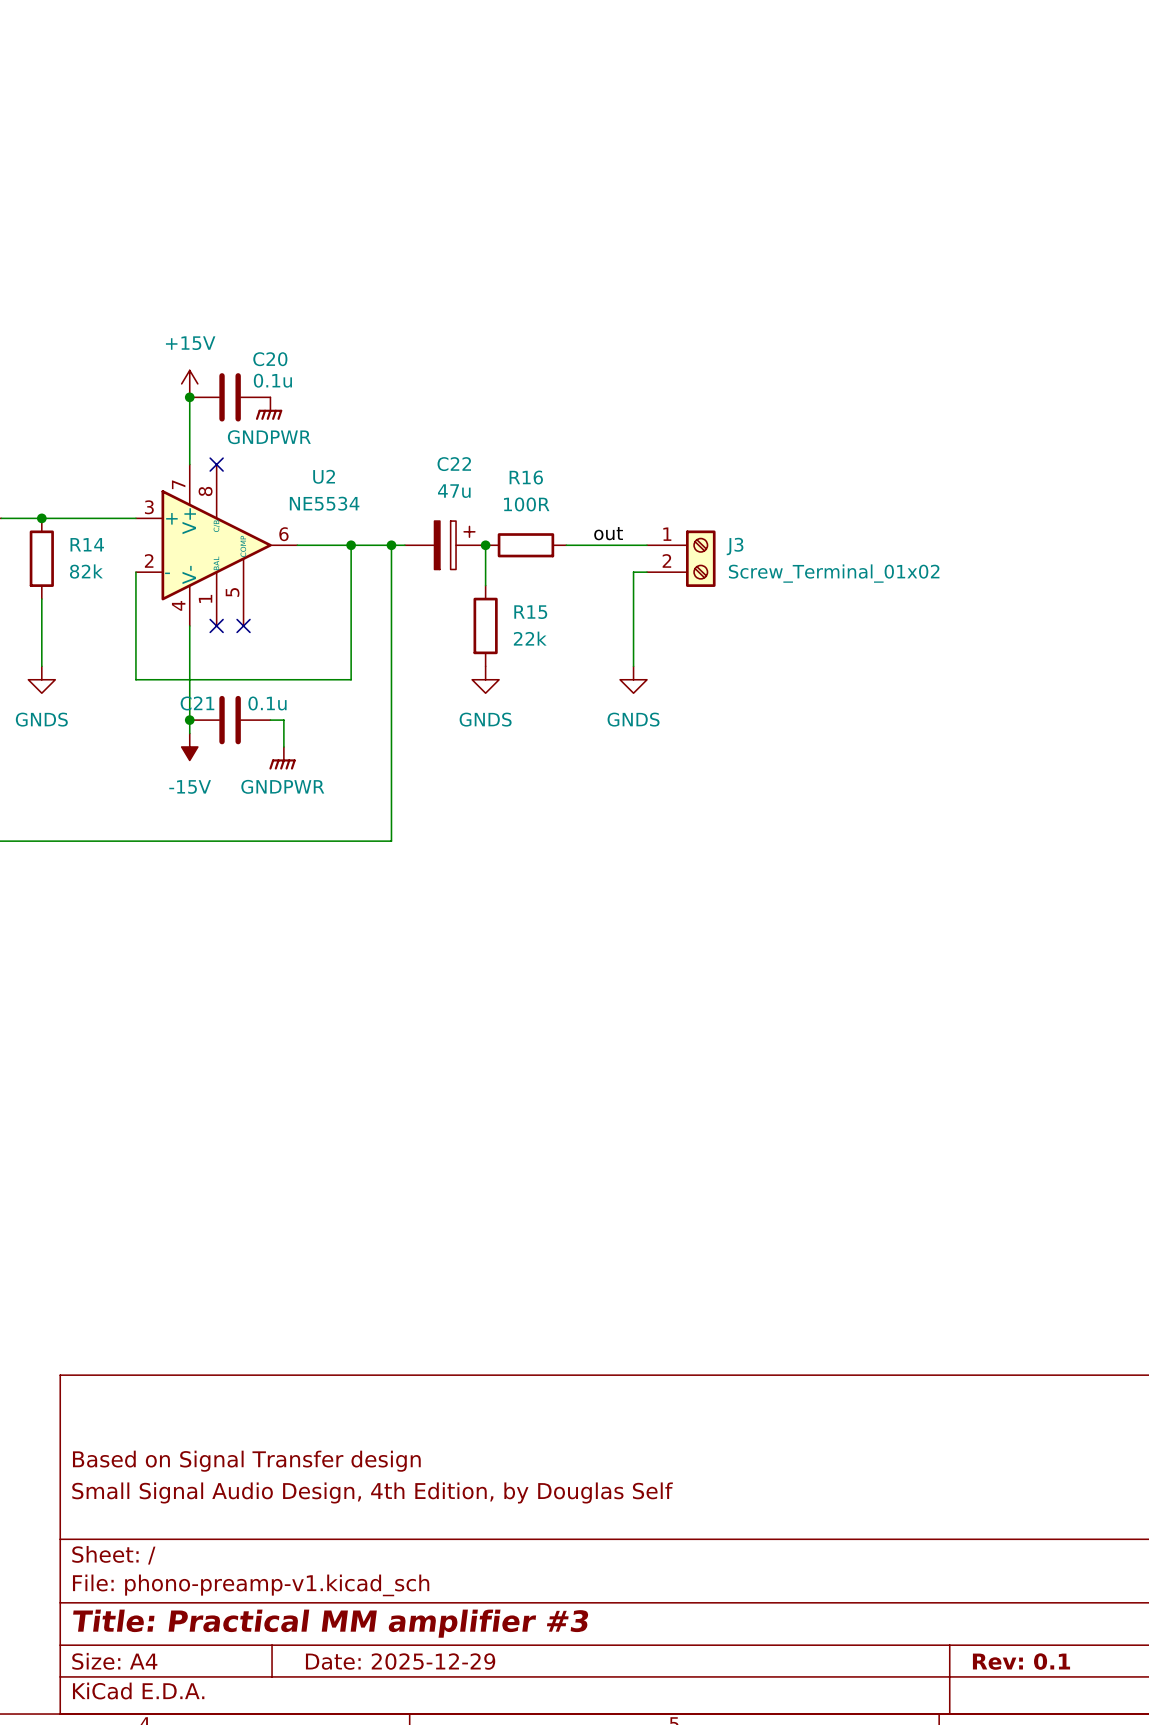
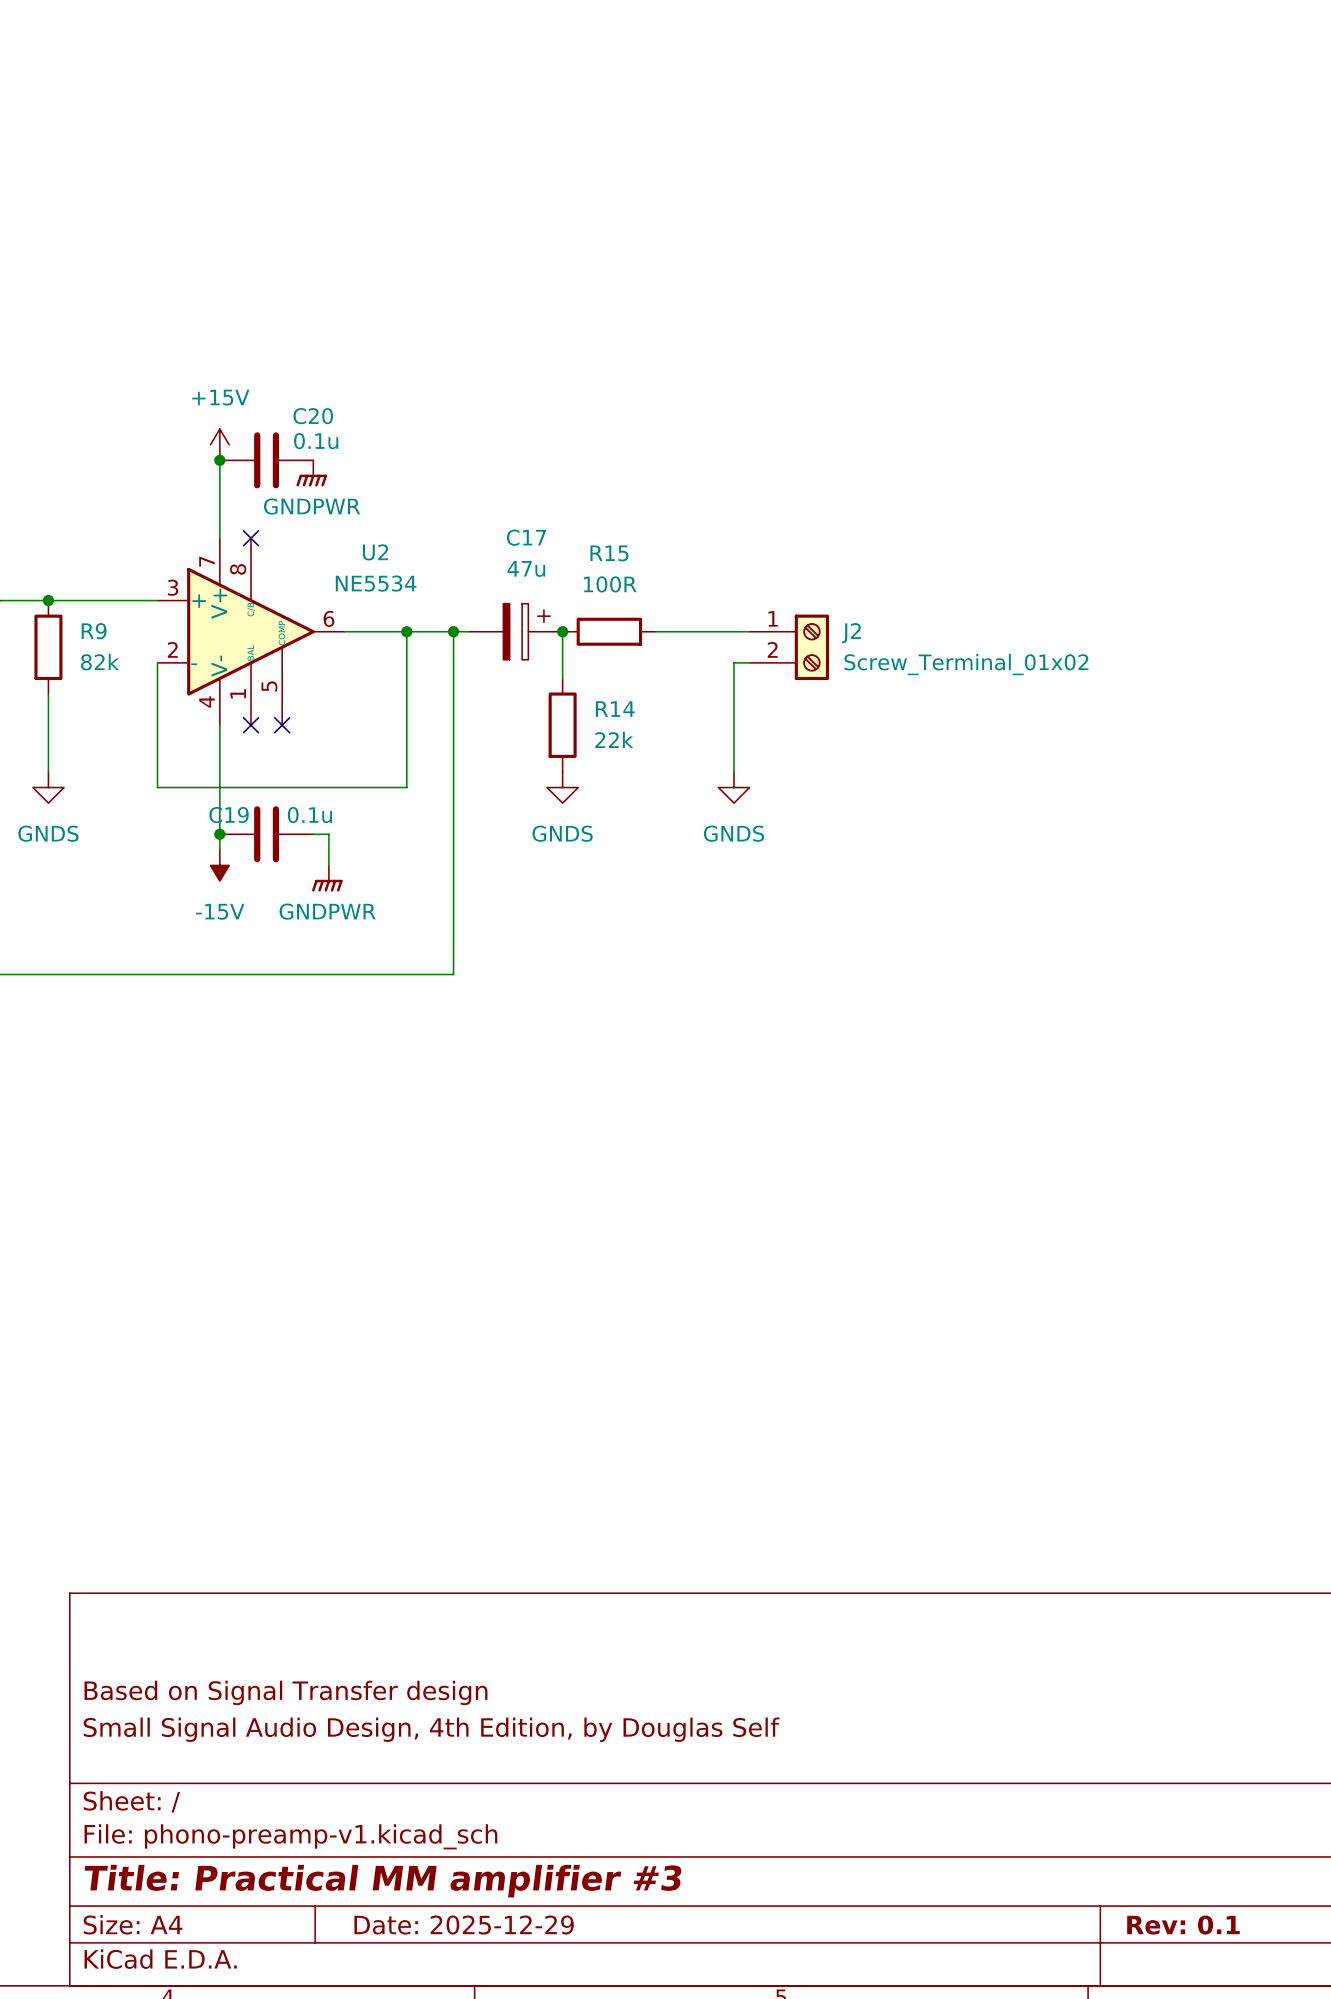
C22 name: C22 (454, 464) -> C17 (526, 537)
R16 name: R16 (526, 477) -> R15 (609, 553)
label: out (608, 533) -> none
R14 name: R14 (87, 544) -> R9 (94, 631)
J3 name: J3 (735, 546) -> J2 (851, 633)
R15 name: R15 (530, 612) -> R14 (615, 709)
C21 name: C21 (197, 703) -> C19 (229, 815)

